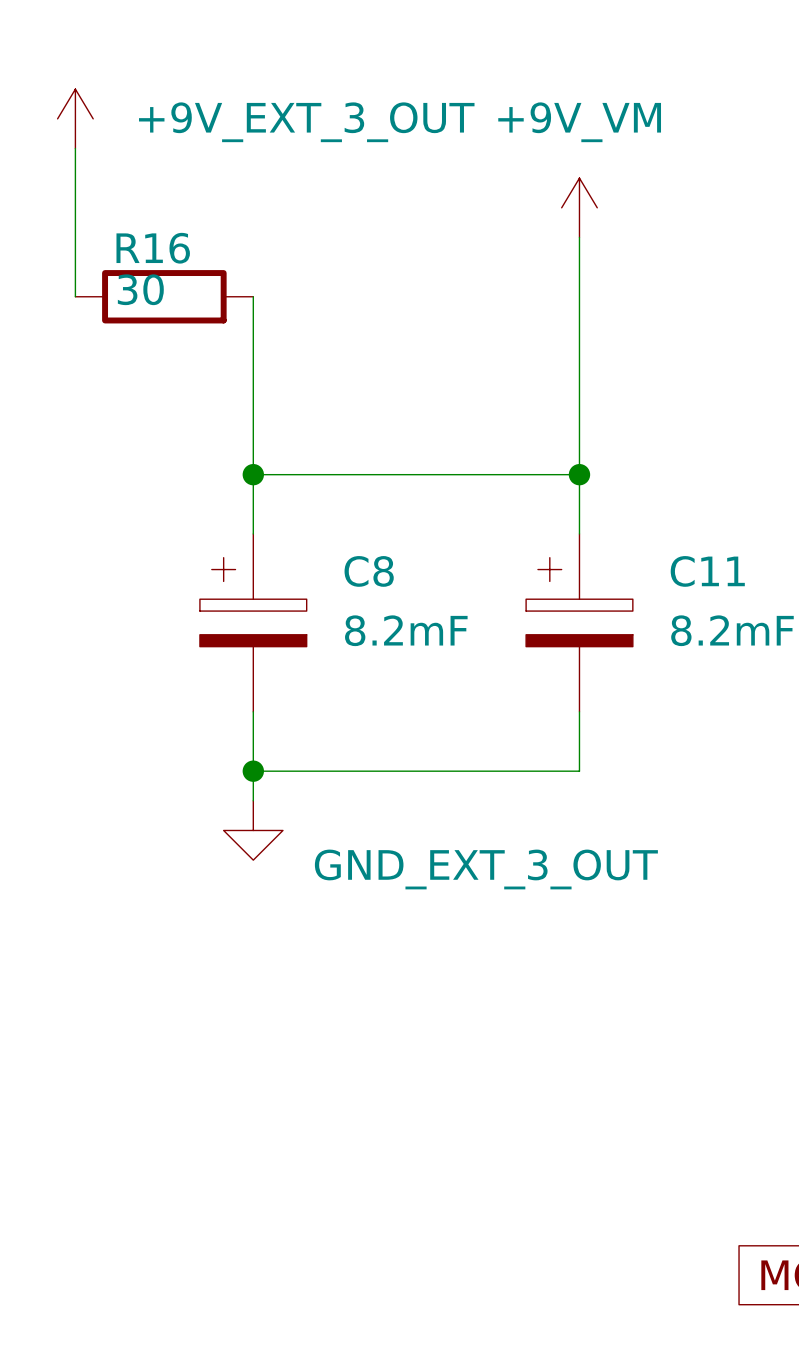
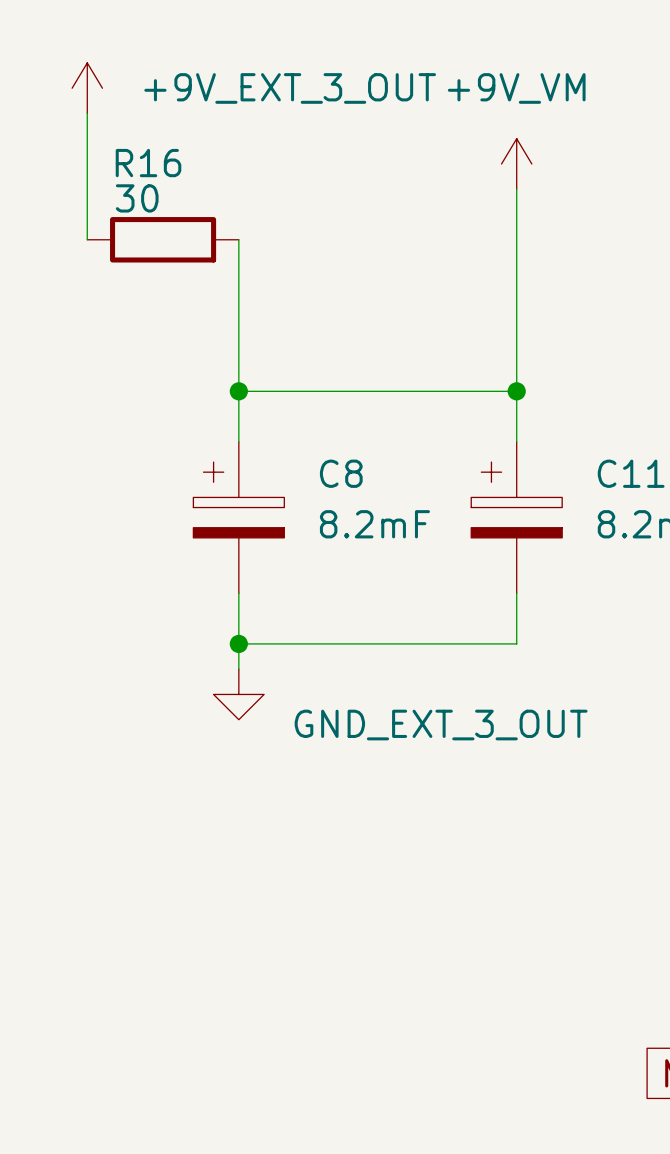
R16 name position: R16 (153, 248) -> R16 (148, 163)
R16 value position: 30 (140, 289) -> 30 (137, 198)

